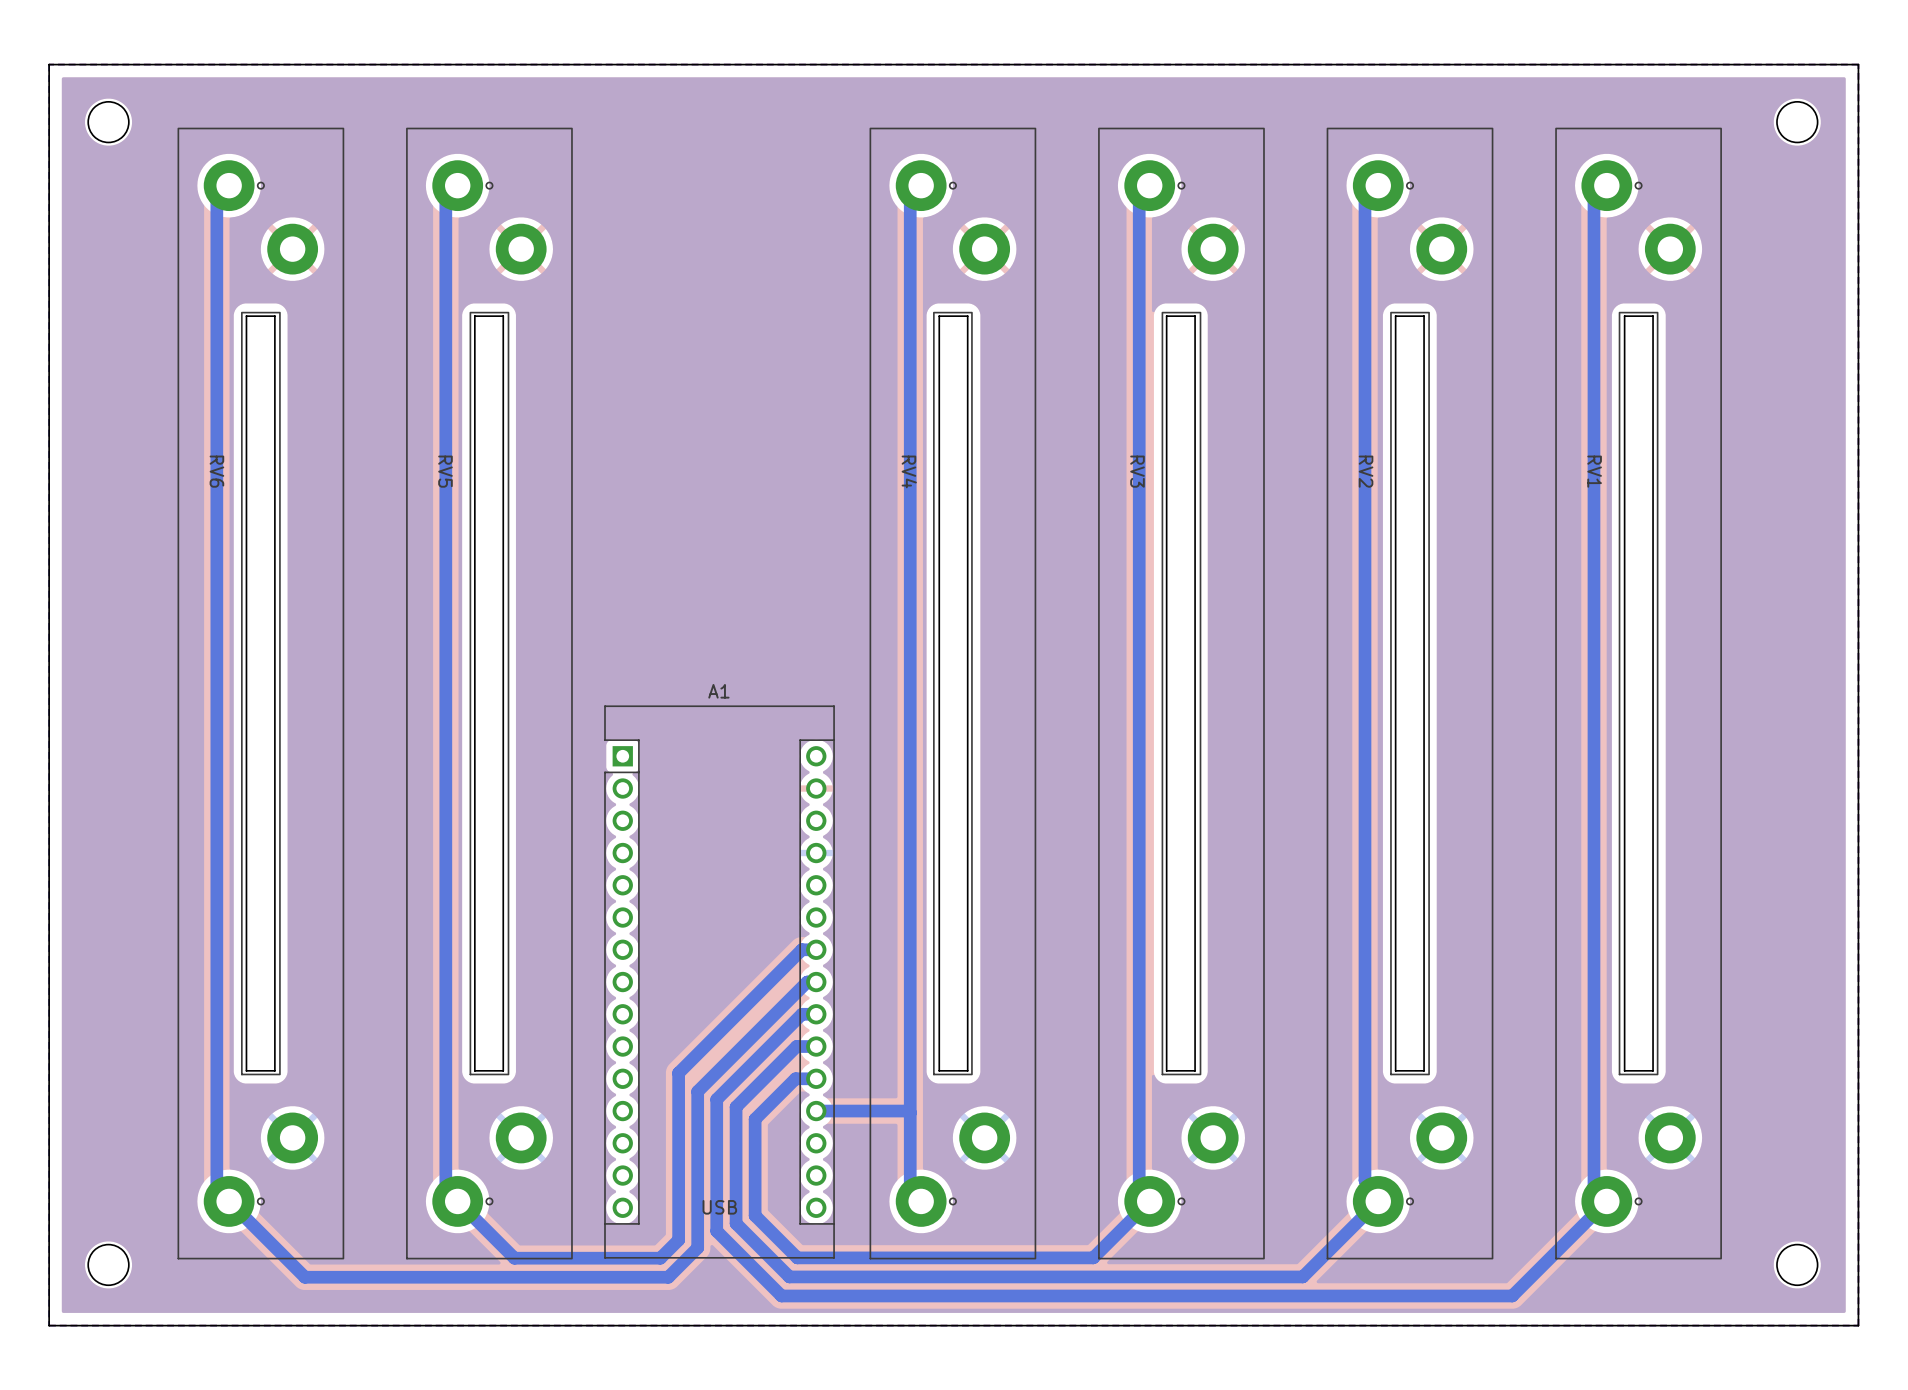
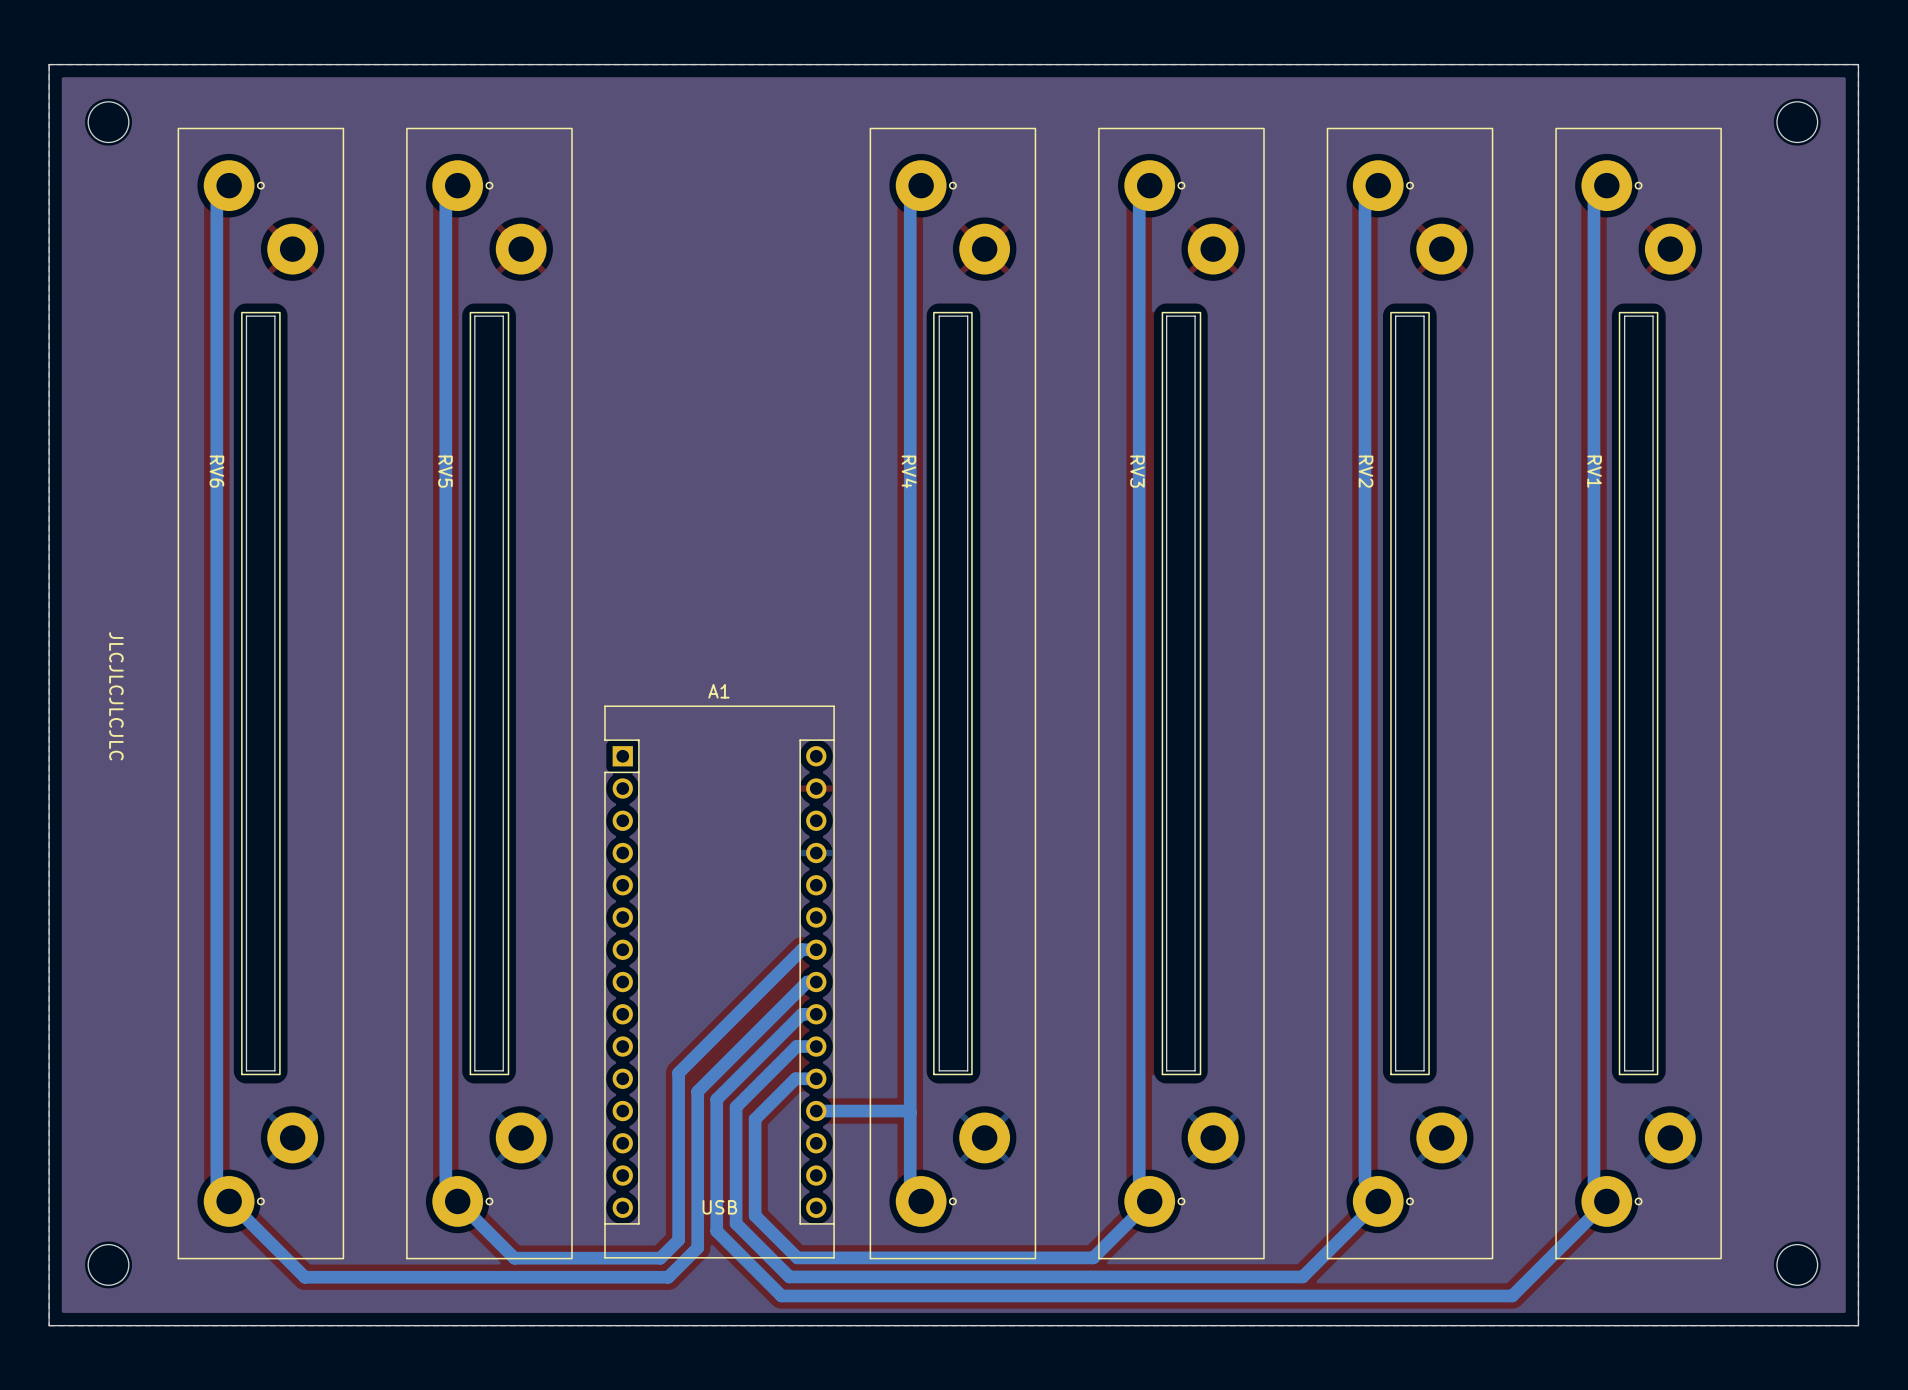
text: none -> JLCJLCJLCJLC (116, 696)

